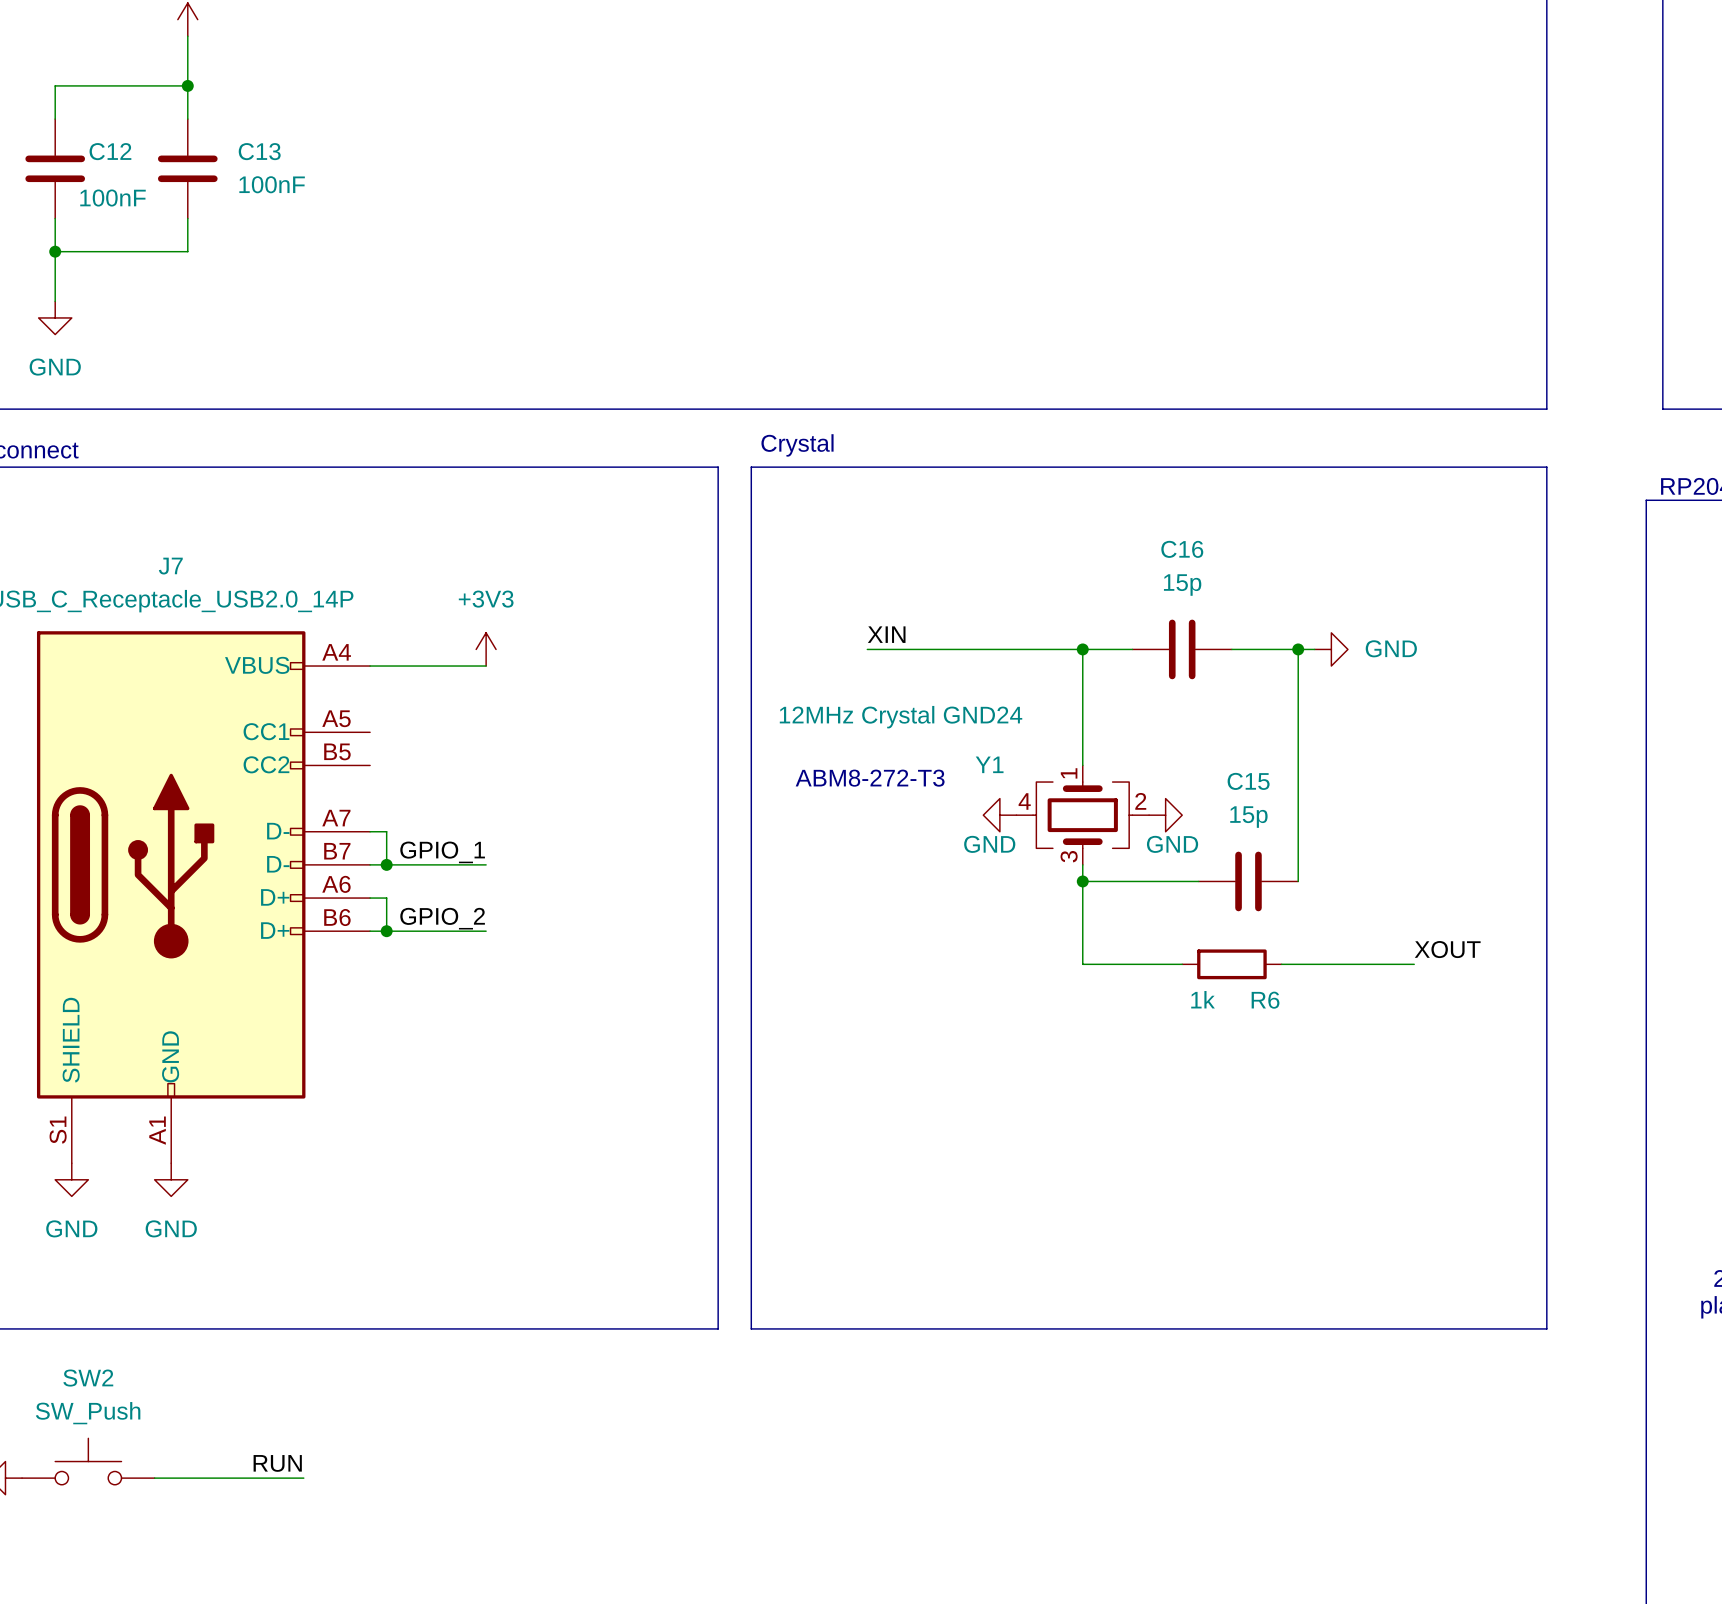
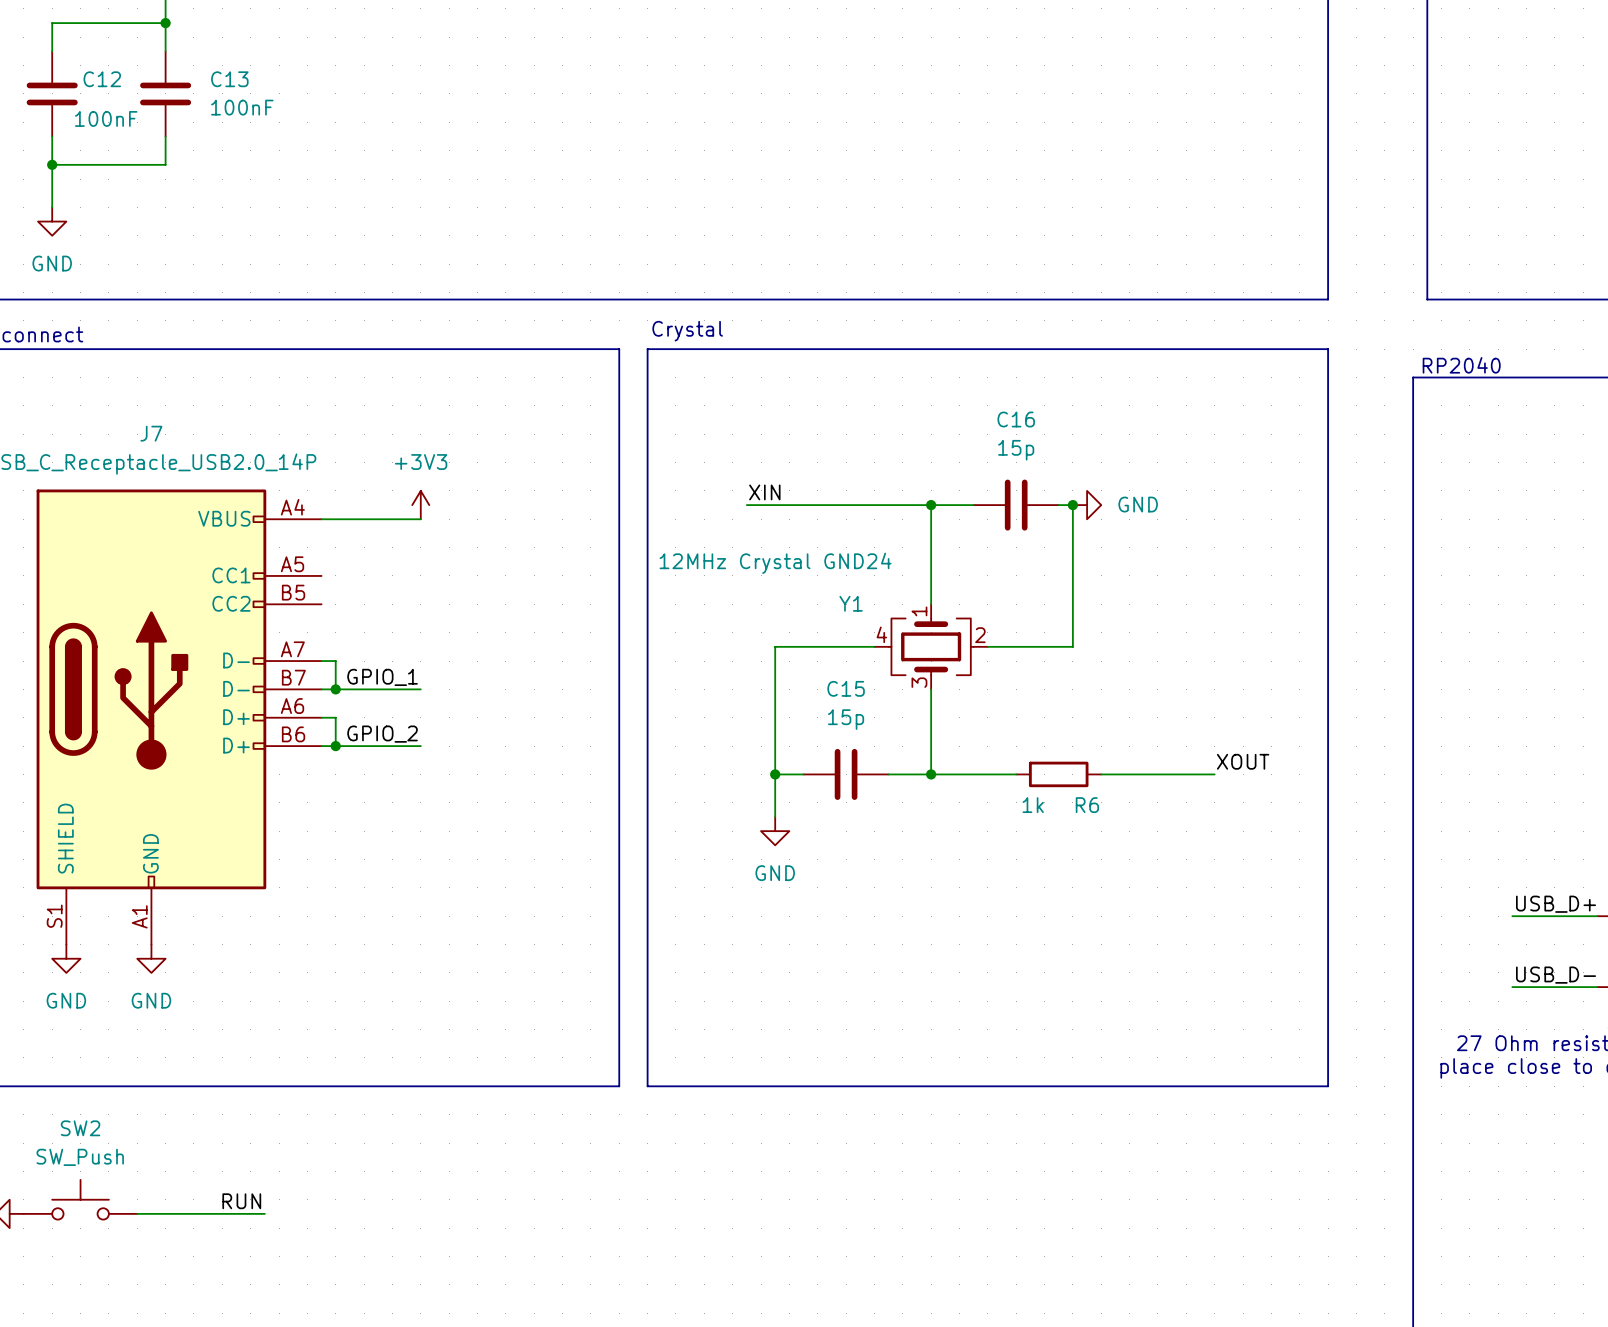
wire: (1248, 649) (1314, 649) -> (1072, 505) (1072, 646) (987, 646)
wire: (1298, 649) (1298, 881) -> none
junction position: (1298, 649) -> (1072, 505)
power symbol position: GND (1331, 649) -> GND (1087, 505)
text: ABM8-272-T3 (870, 778) -> none
power symbol: GND (999, 815) -> none
wire: none -> (874, 646) (775, 646) (775, 816)
power symbol: GND (1165, 815) -> none
wire: (1082, 881) (1198, 881) -> none
junction: (1082, 881) -> none
C15 position: (1248, 881) -> (846, 774)
wire: none -> (775, 774) (803, 774)
junction: none -> (775, 774)
wire: none -> (888, 774) (931, 774)
junction: none -> (931, 774)
power symbol: none -> GND (775, 831)

